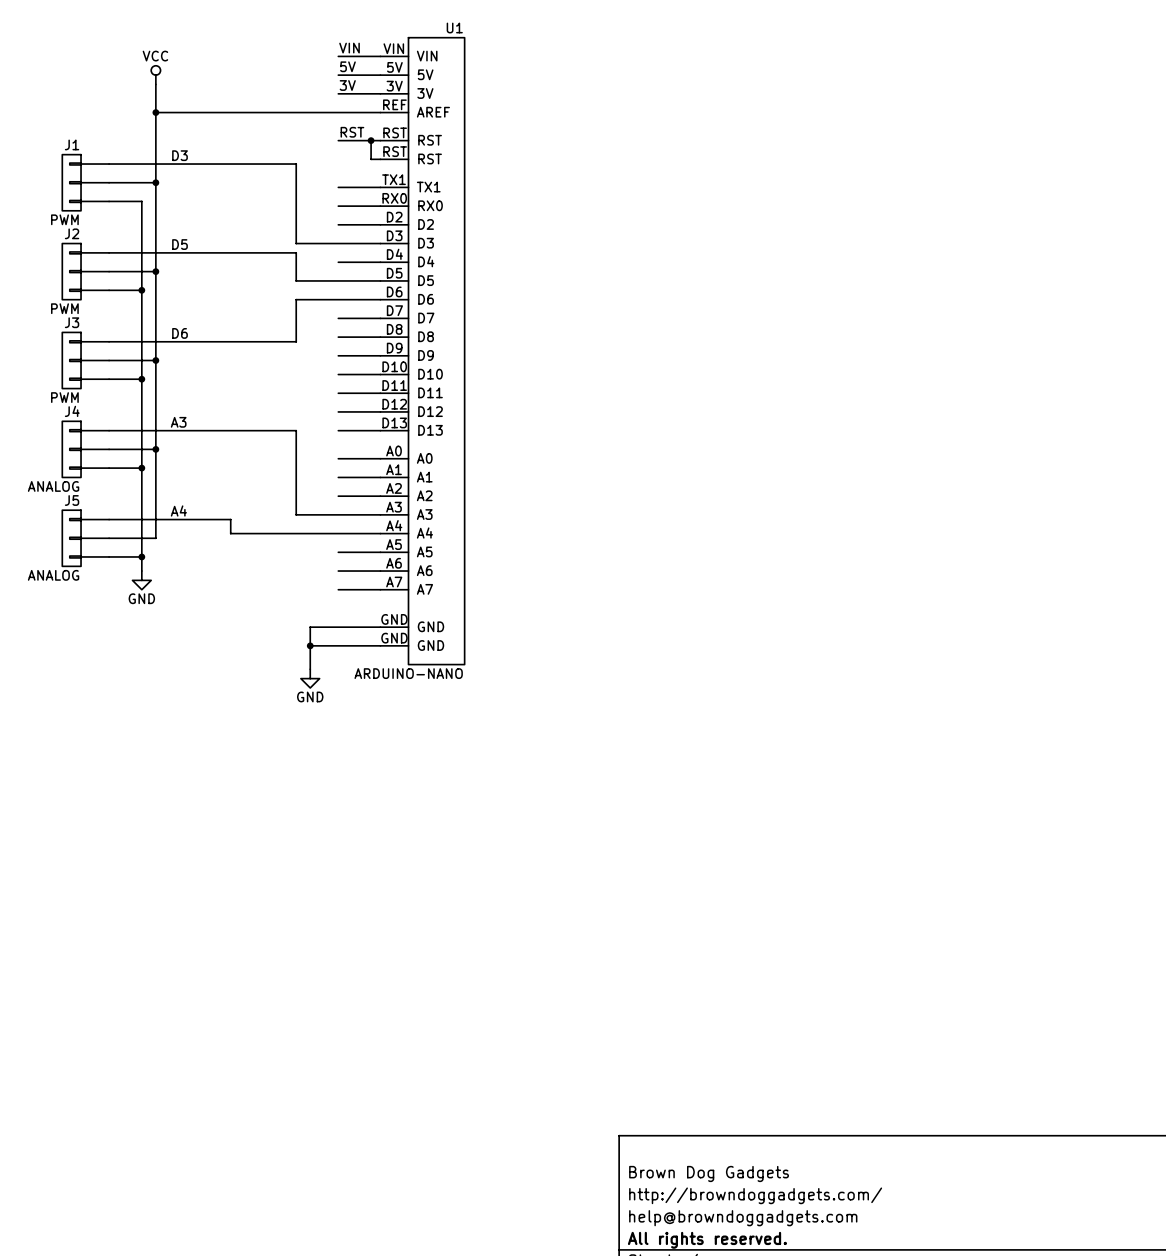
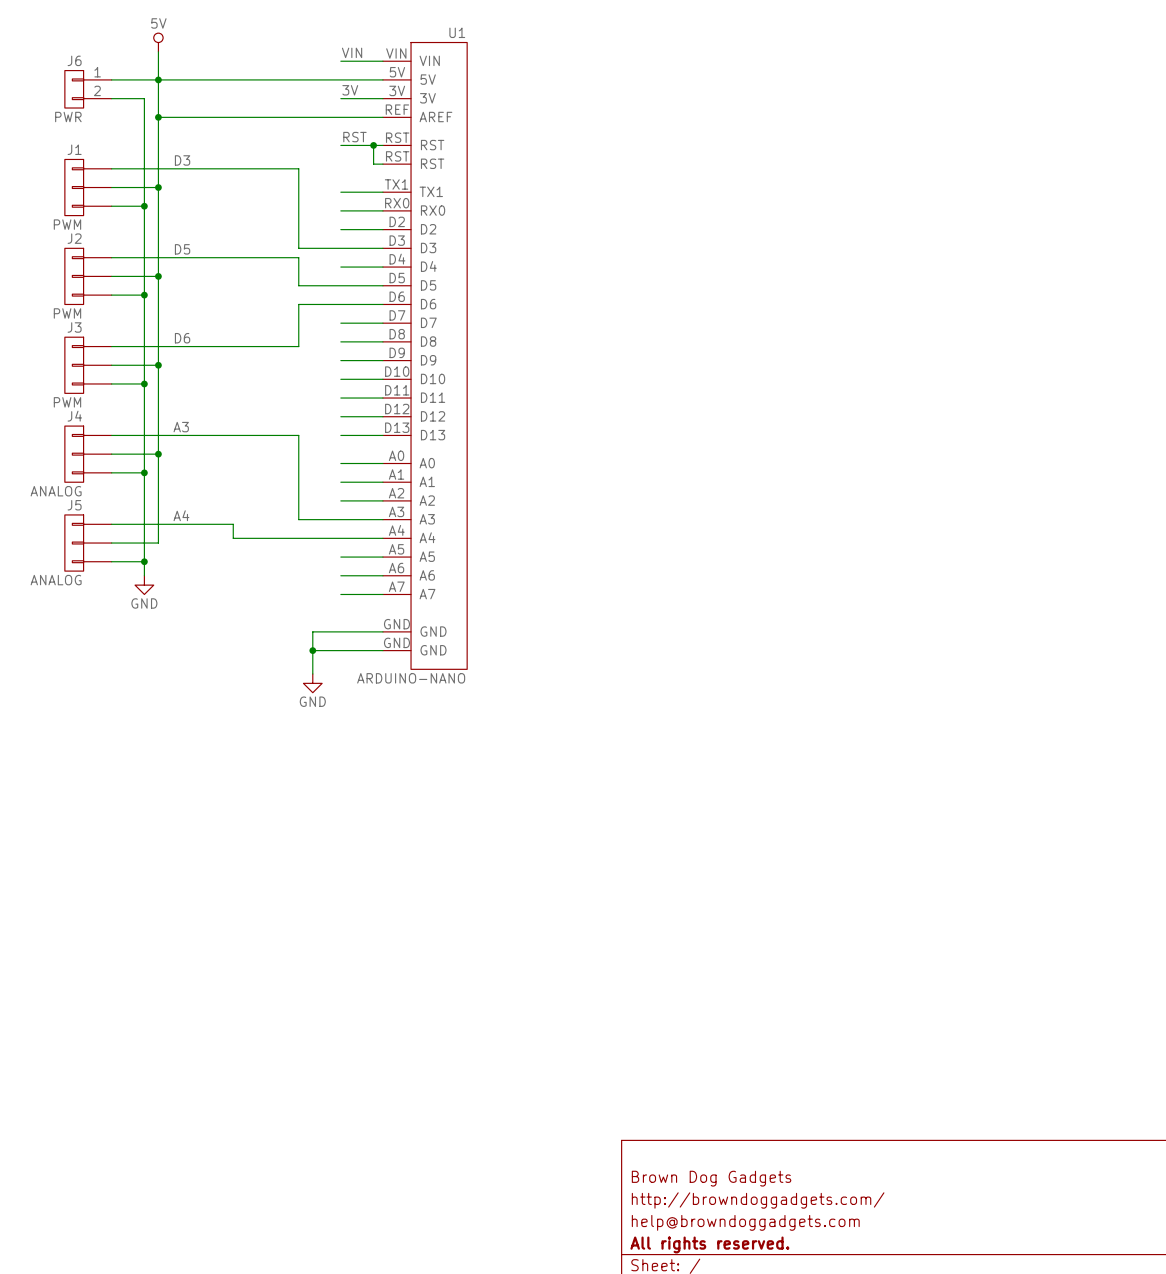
power symbol: none -> 5V (158, 42)
wire: none -> (158, 51) (158, 89)
label: 5V (347, 66) -> none
wire: none -> (111, 79) (340, 79)
power symbol: VCC (155, 75) -> none
junction: none -> (158, 79)
J6: none -> PWR (88, 89)
wire: none -> (111, 98) (144, 98) (144, 206)
junction: none -> (144, 206)

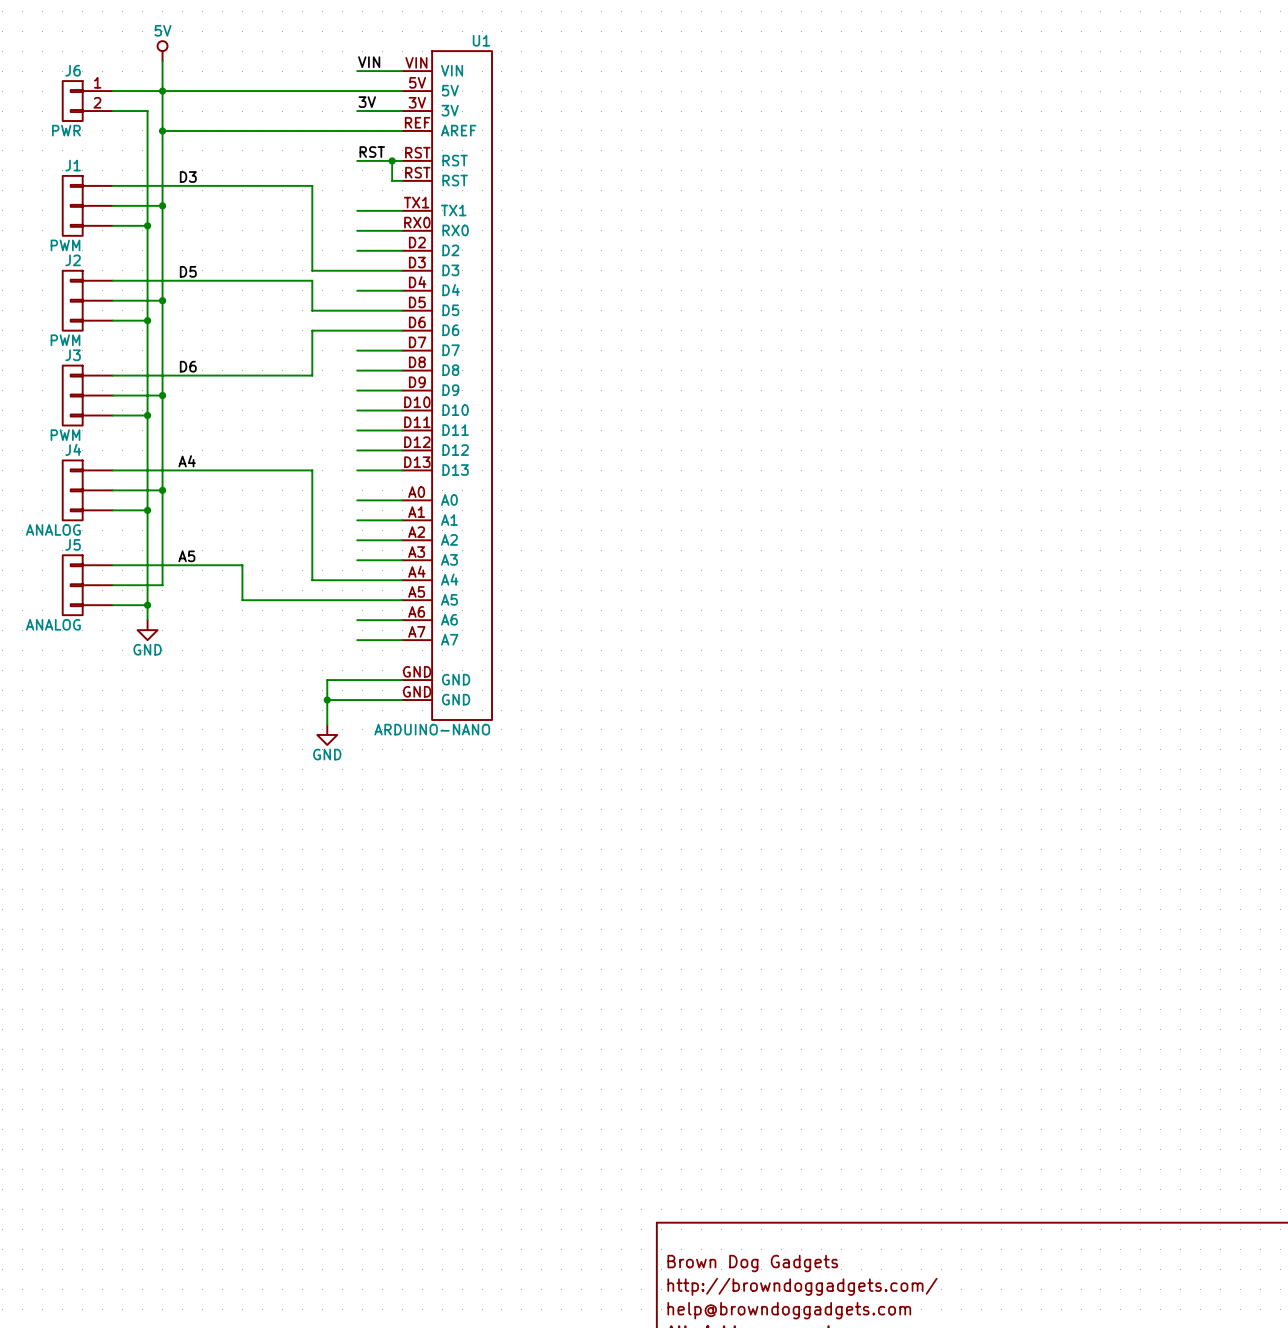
label: A3 (181, 427) -> A4 (187, 461)
label: A4 (181, 515) -> A5 (186, 556)
wire: (298, 519) (340, 519) -> (312, 560) (312, 580)
wire: (233, 538) (298, 538) -> (242, 580) (242, 600) (357, 600)

